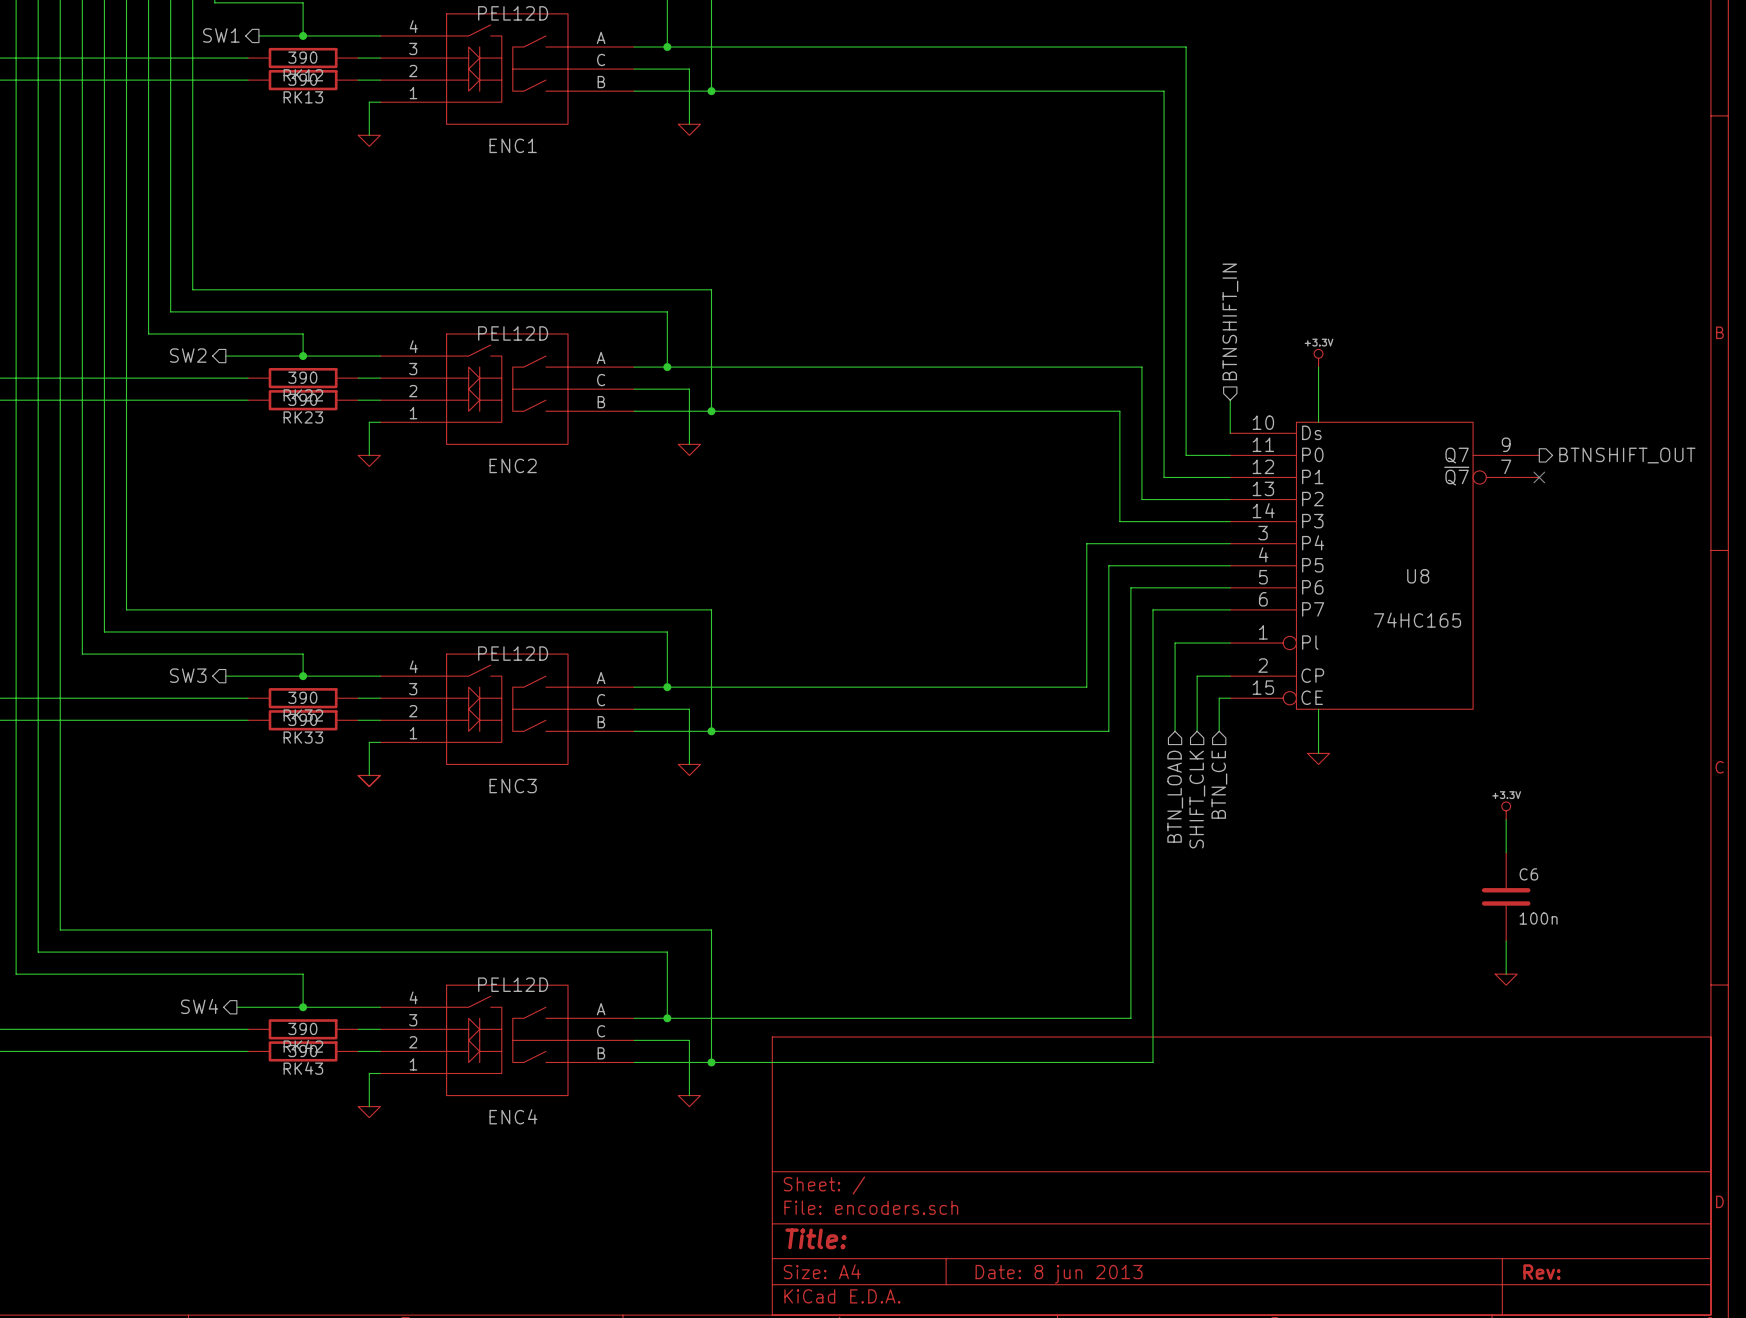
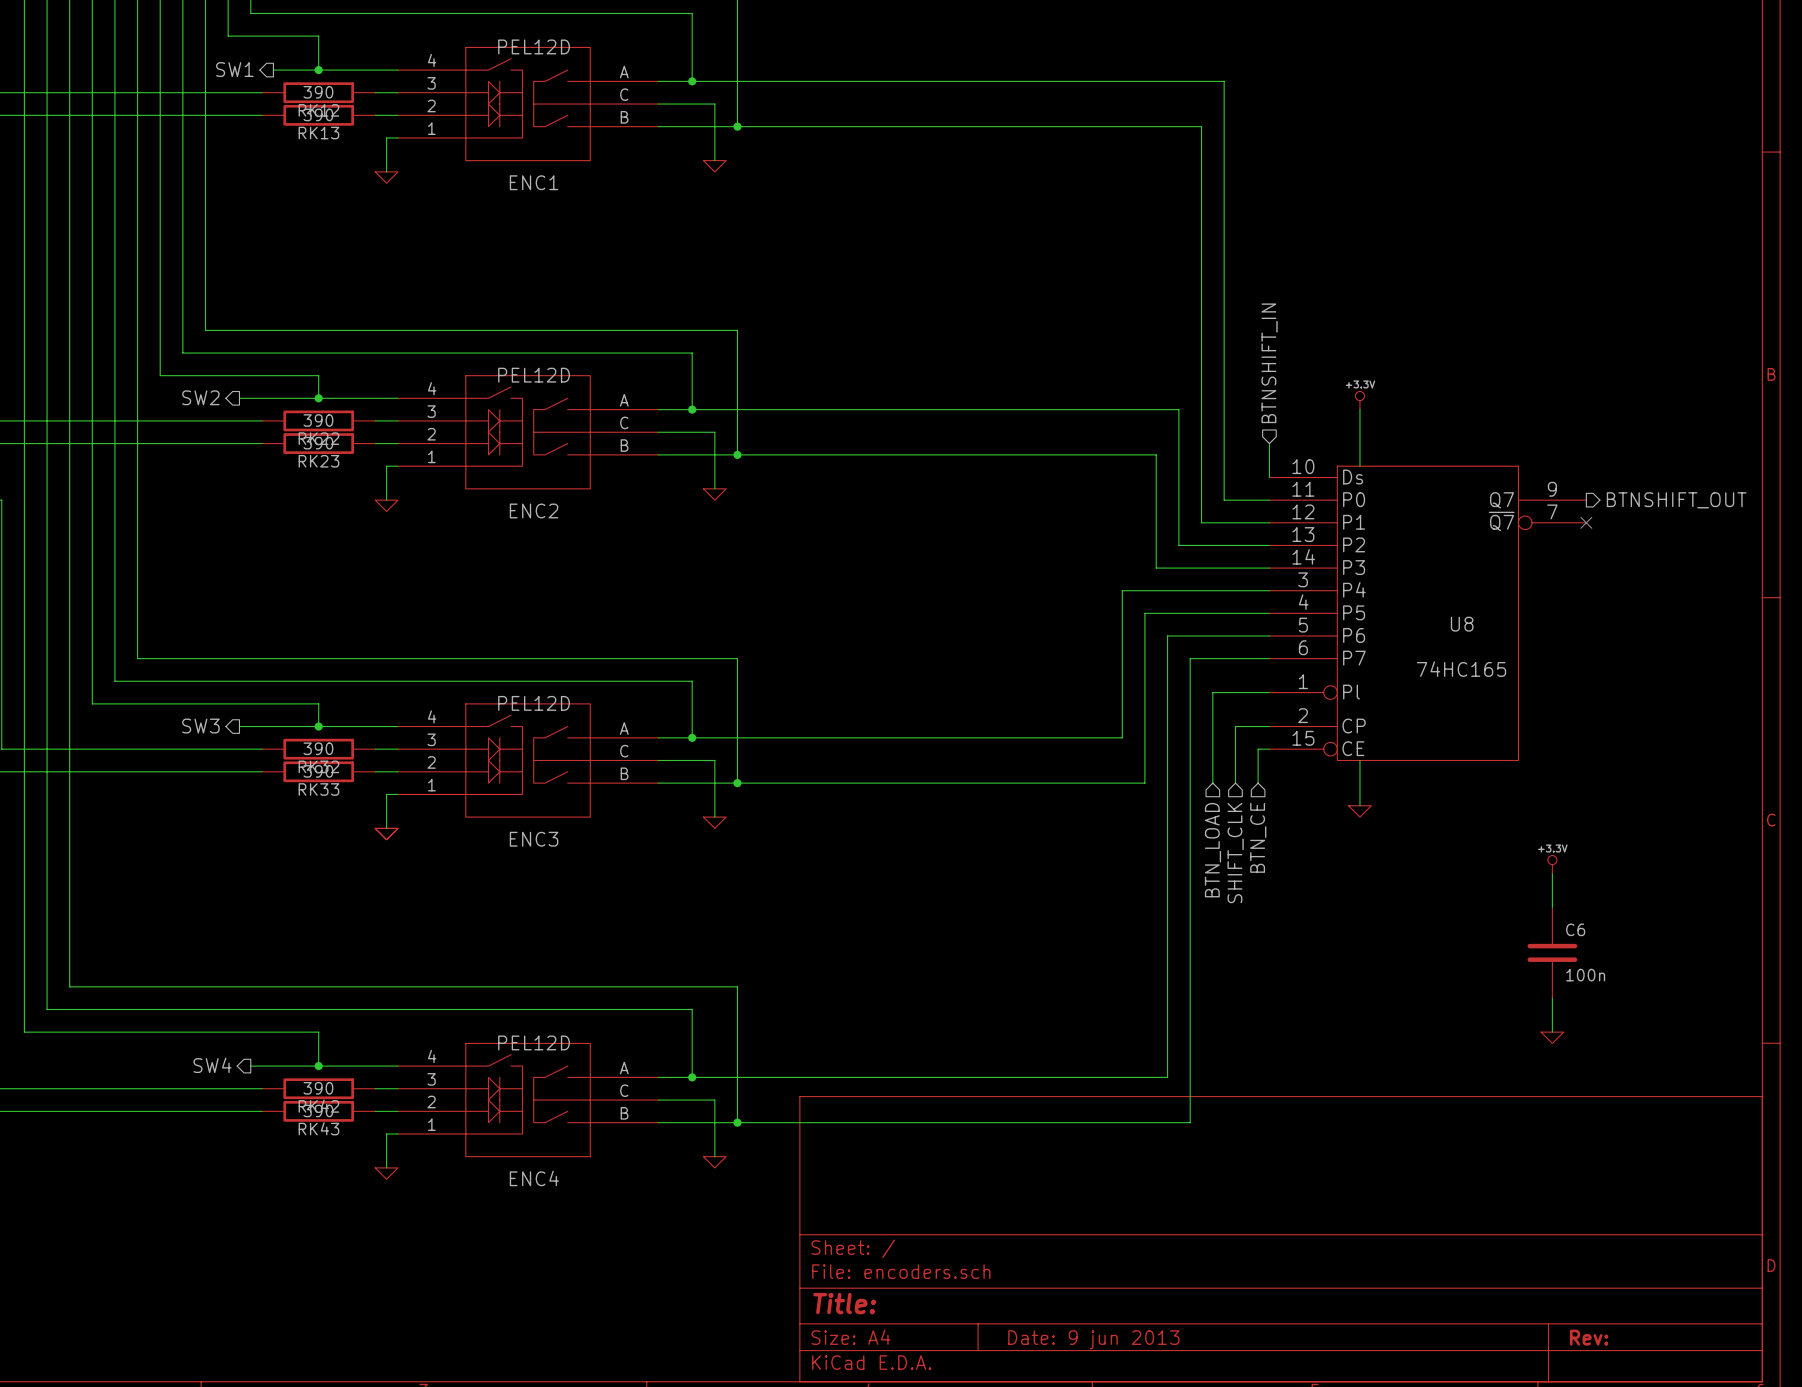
title block: Date: 8 jun 2013 (1059, 1274) -> Date: 9 jun 2013 (1093, 1339)

